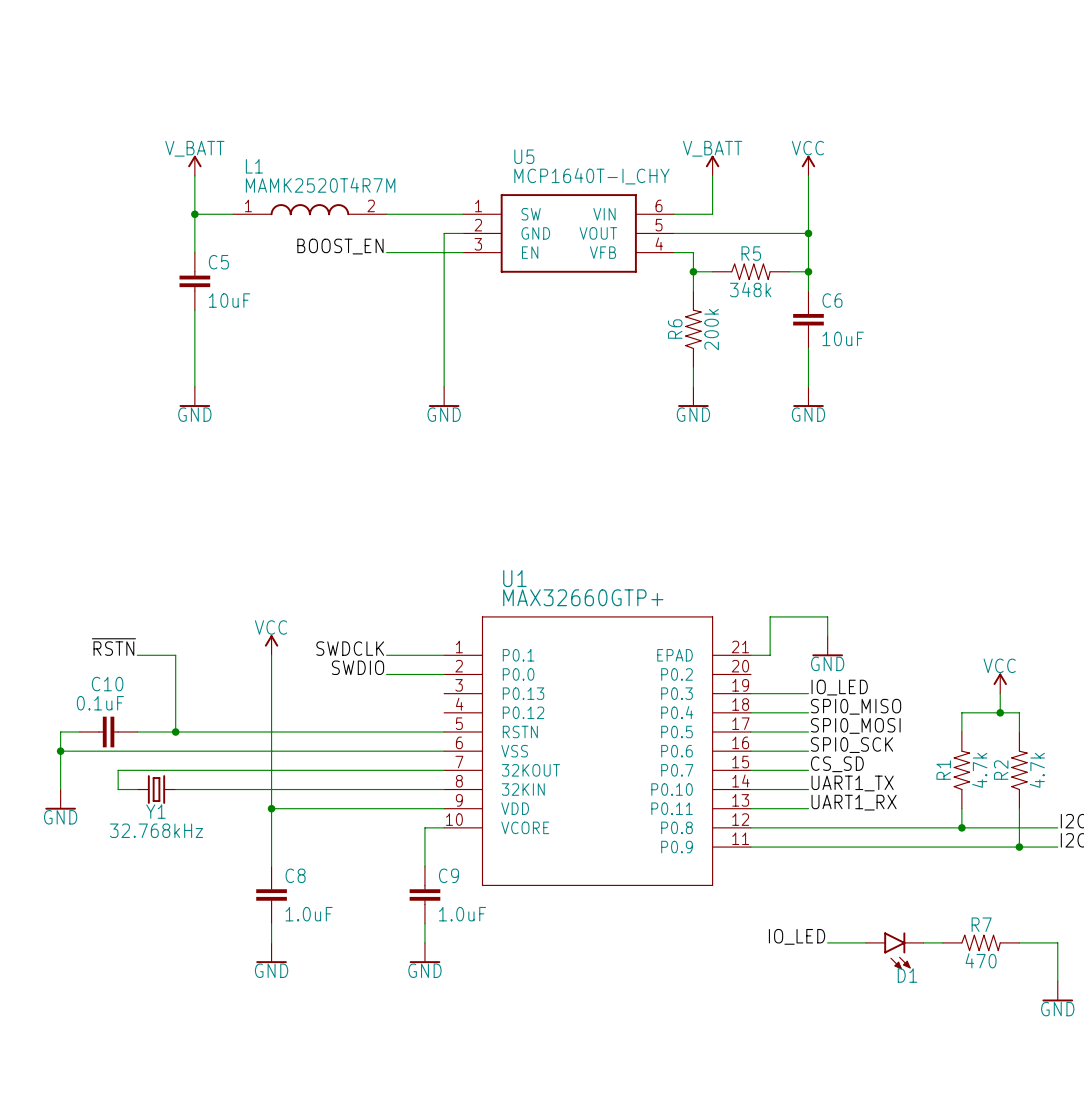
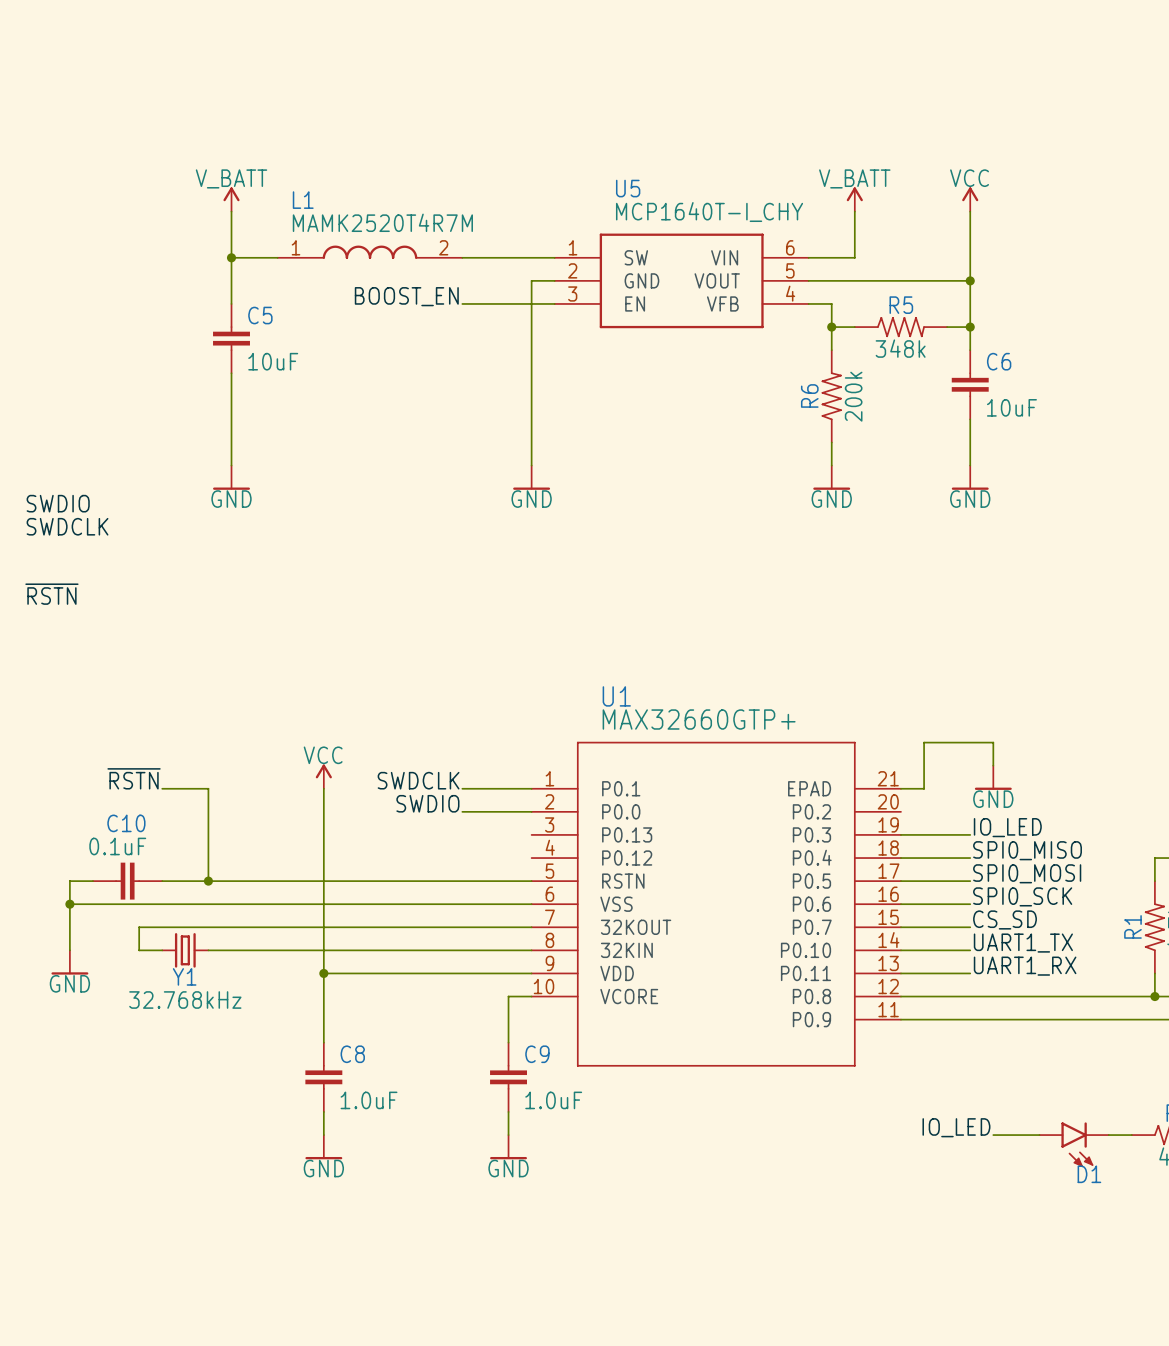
label: none -> SWDIO (58, 503)
label: none -> SWDCLK (67, 526)
label: none -> ~{RSTN} (51, 594)

